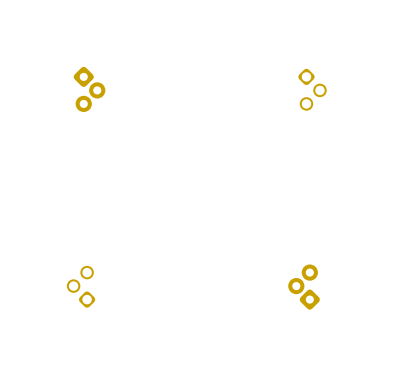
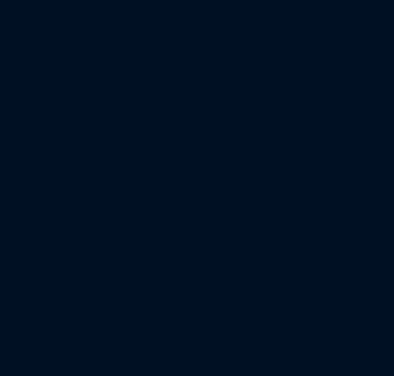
part: (89, 89) -> none
part: (312, 89) -> none
part: (81, 286) -> none
part: (304, 287) -> none

